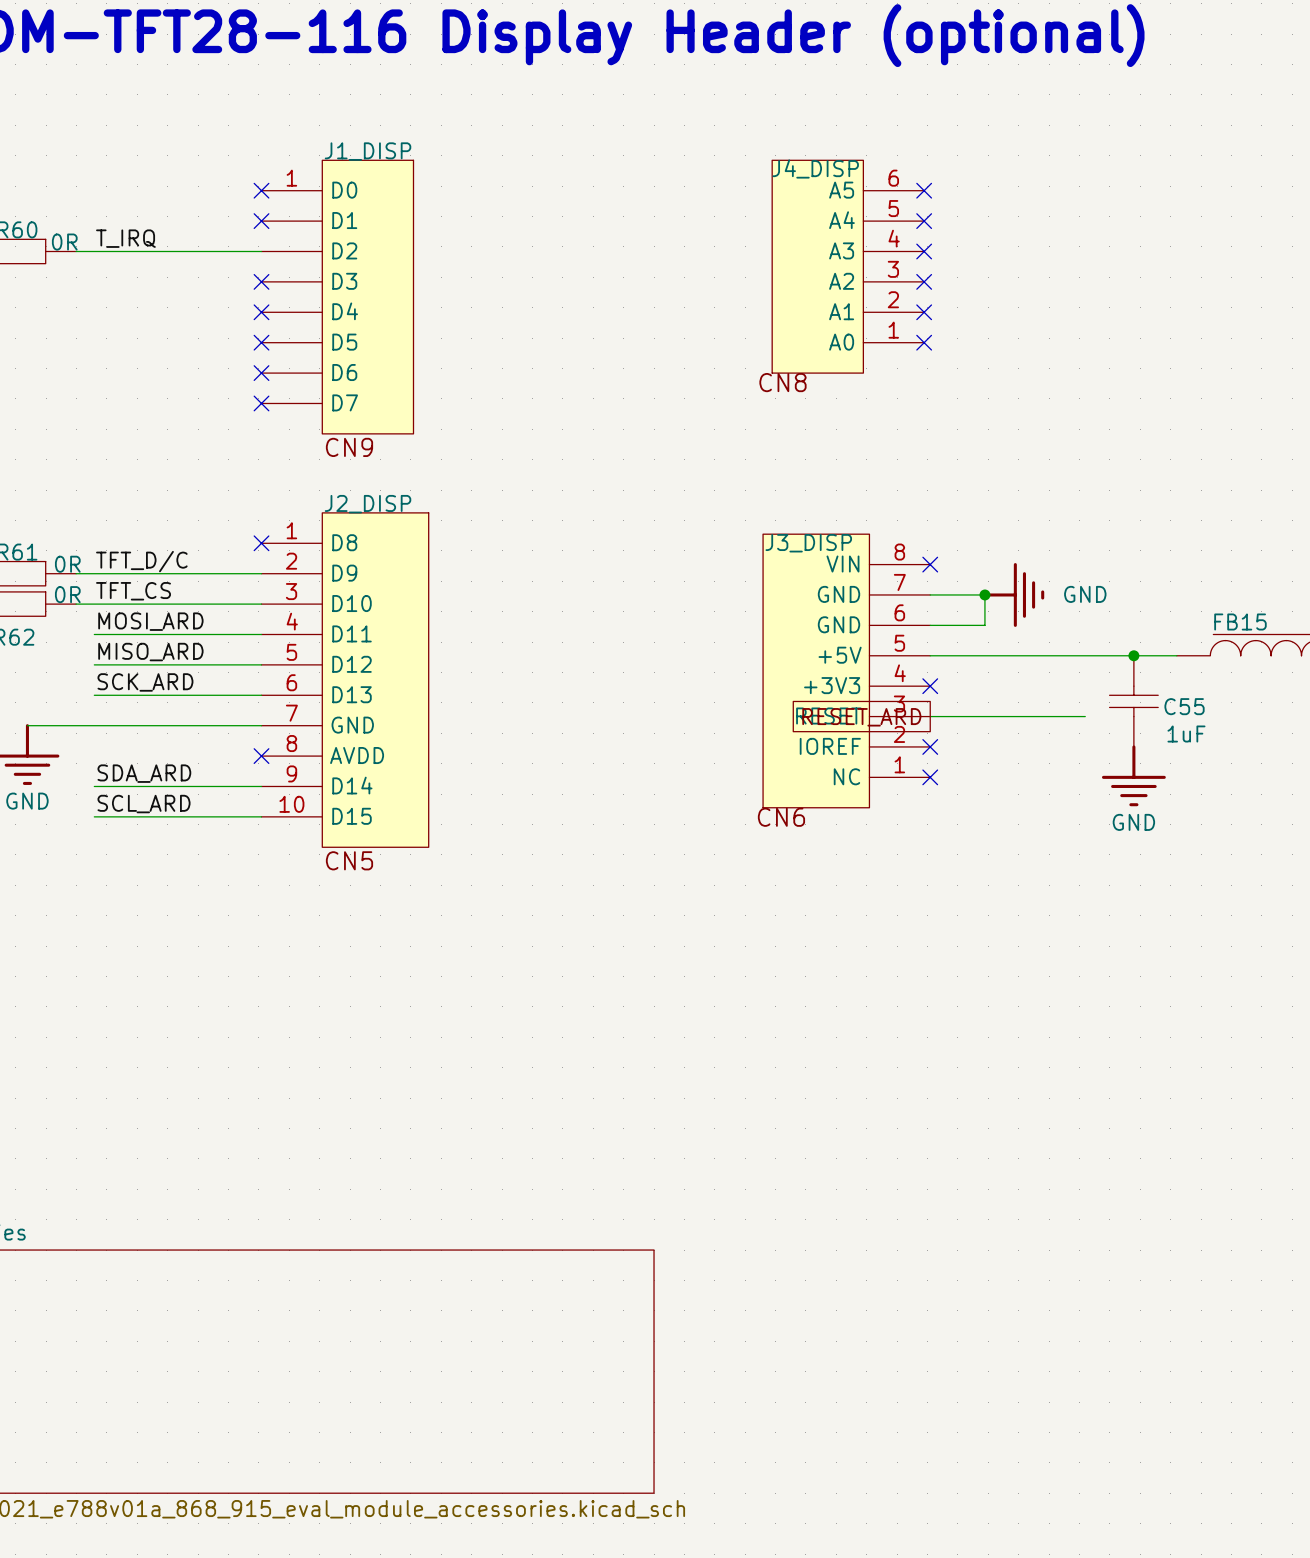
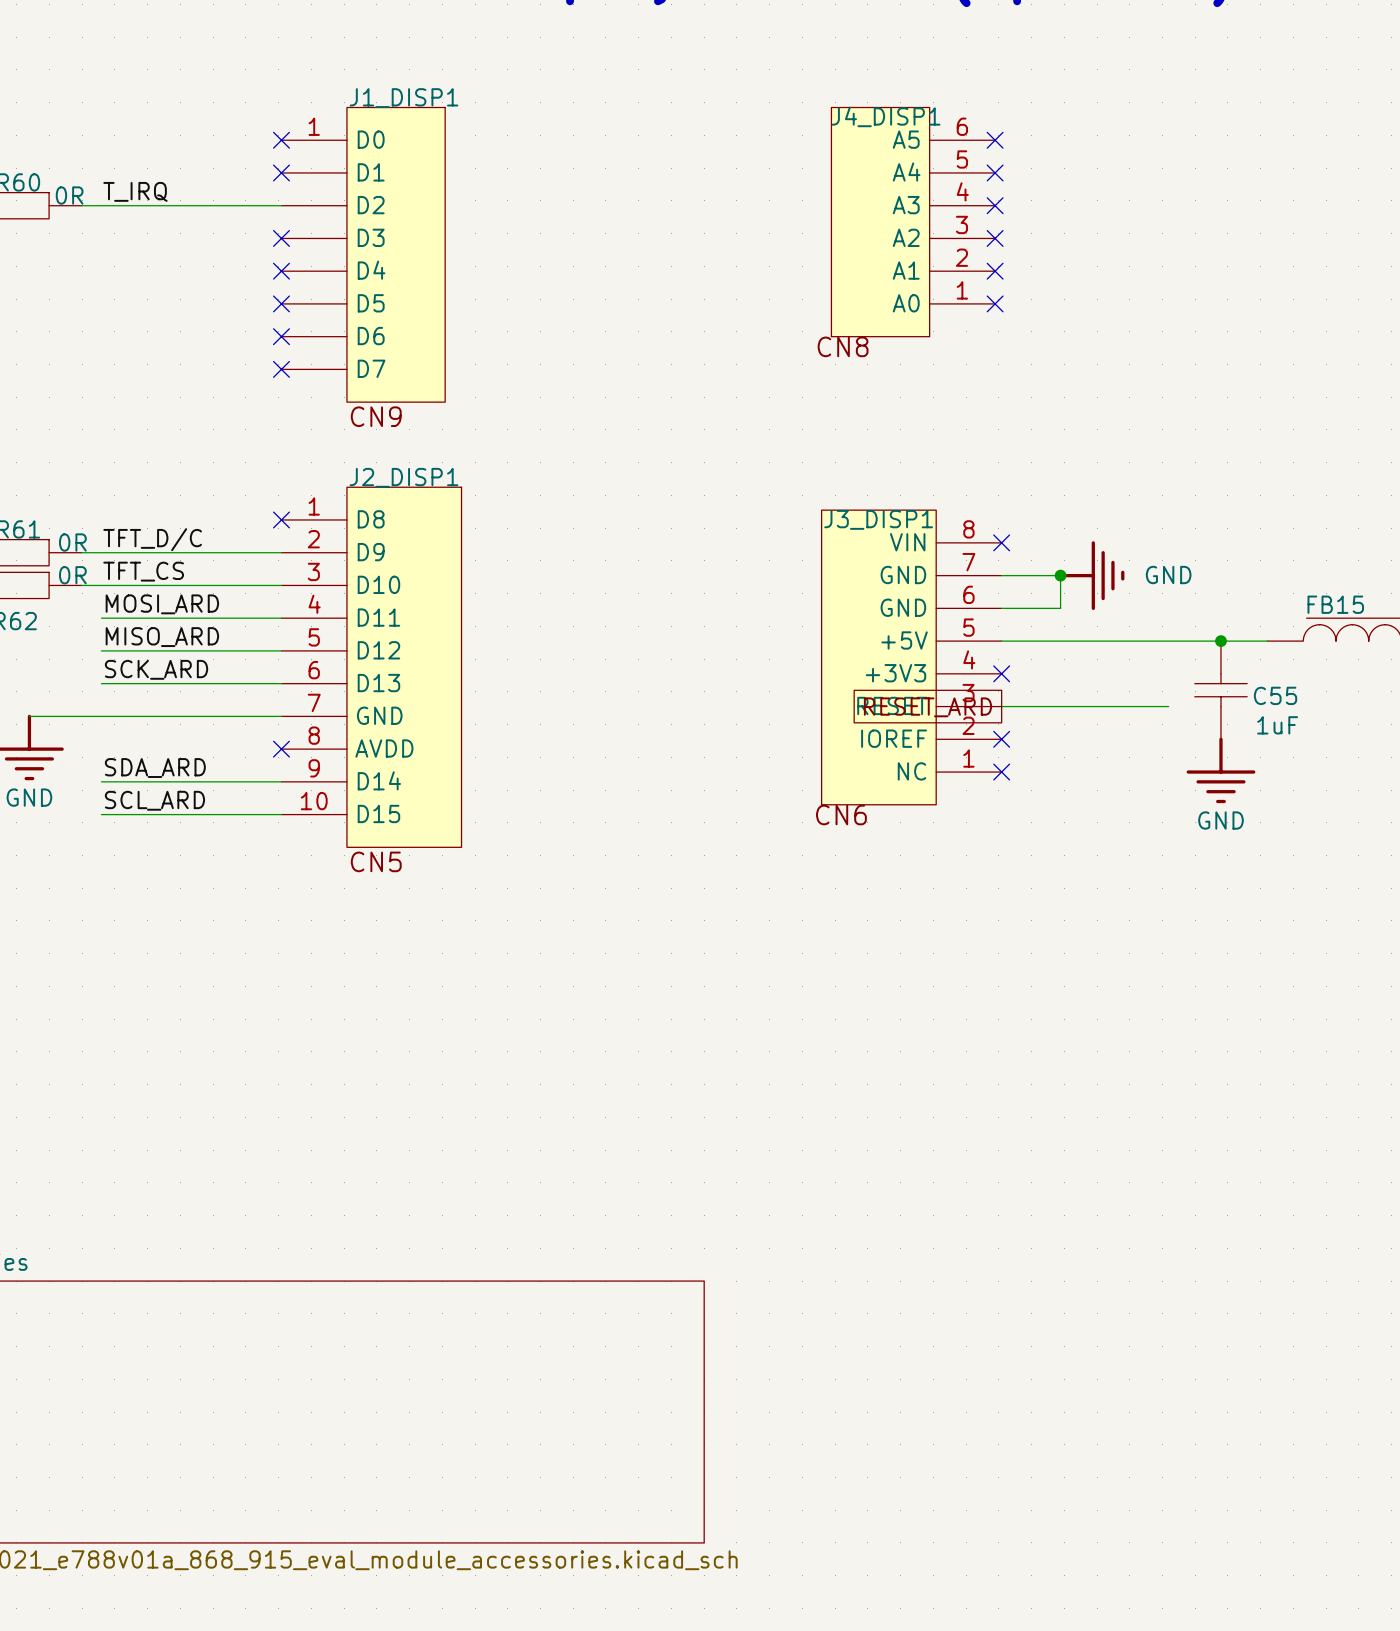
J1_DISP name: J1_DISP (368, 151) -> J1_DISP1 (403, 98)
J4_DISP name: J4_DISP (815, 168) -> J4_DISP1 (886, 116)
J2_DISP name: J2_DISP (368, 504) -> J2_DISP1 (403, 477)
J3_DISP name: J3_DISP (808, 543) -> J3_DISP1 (878, 519)

